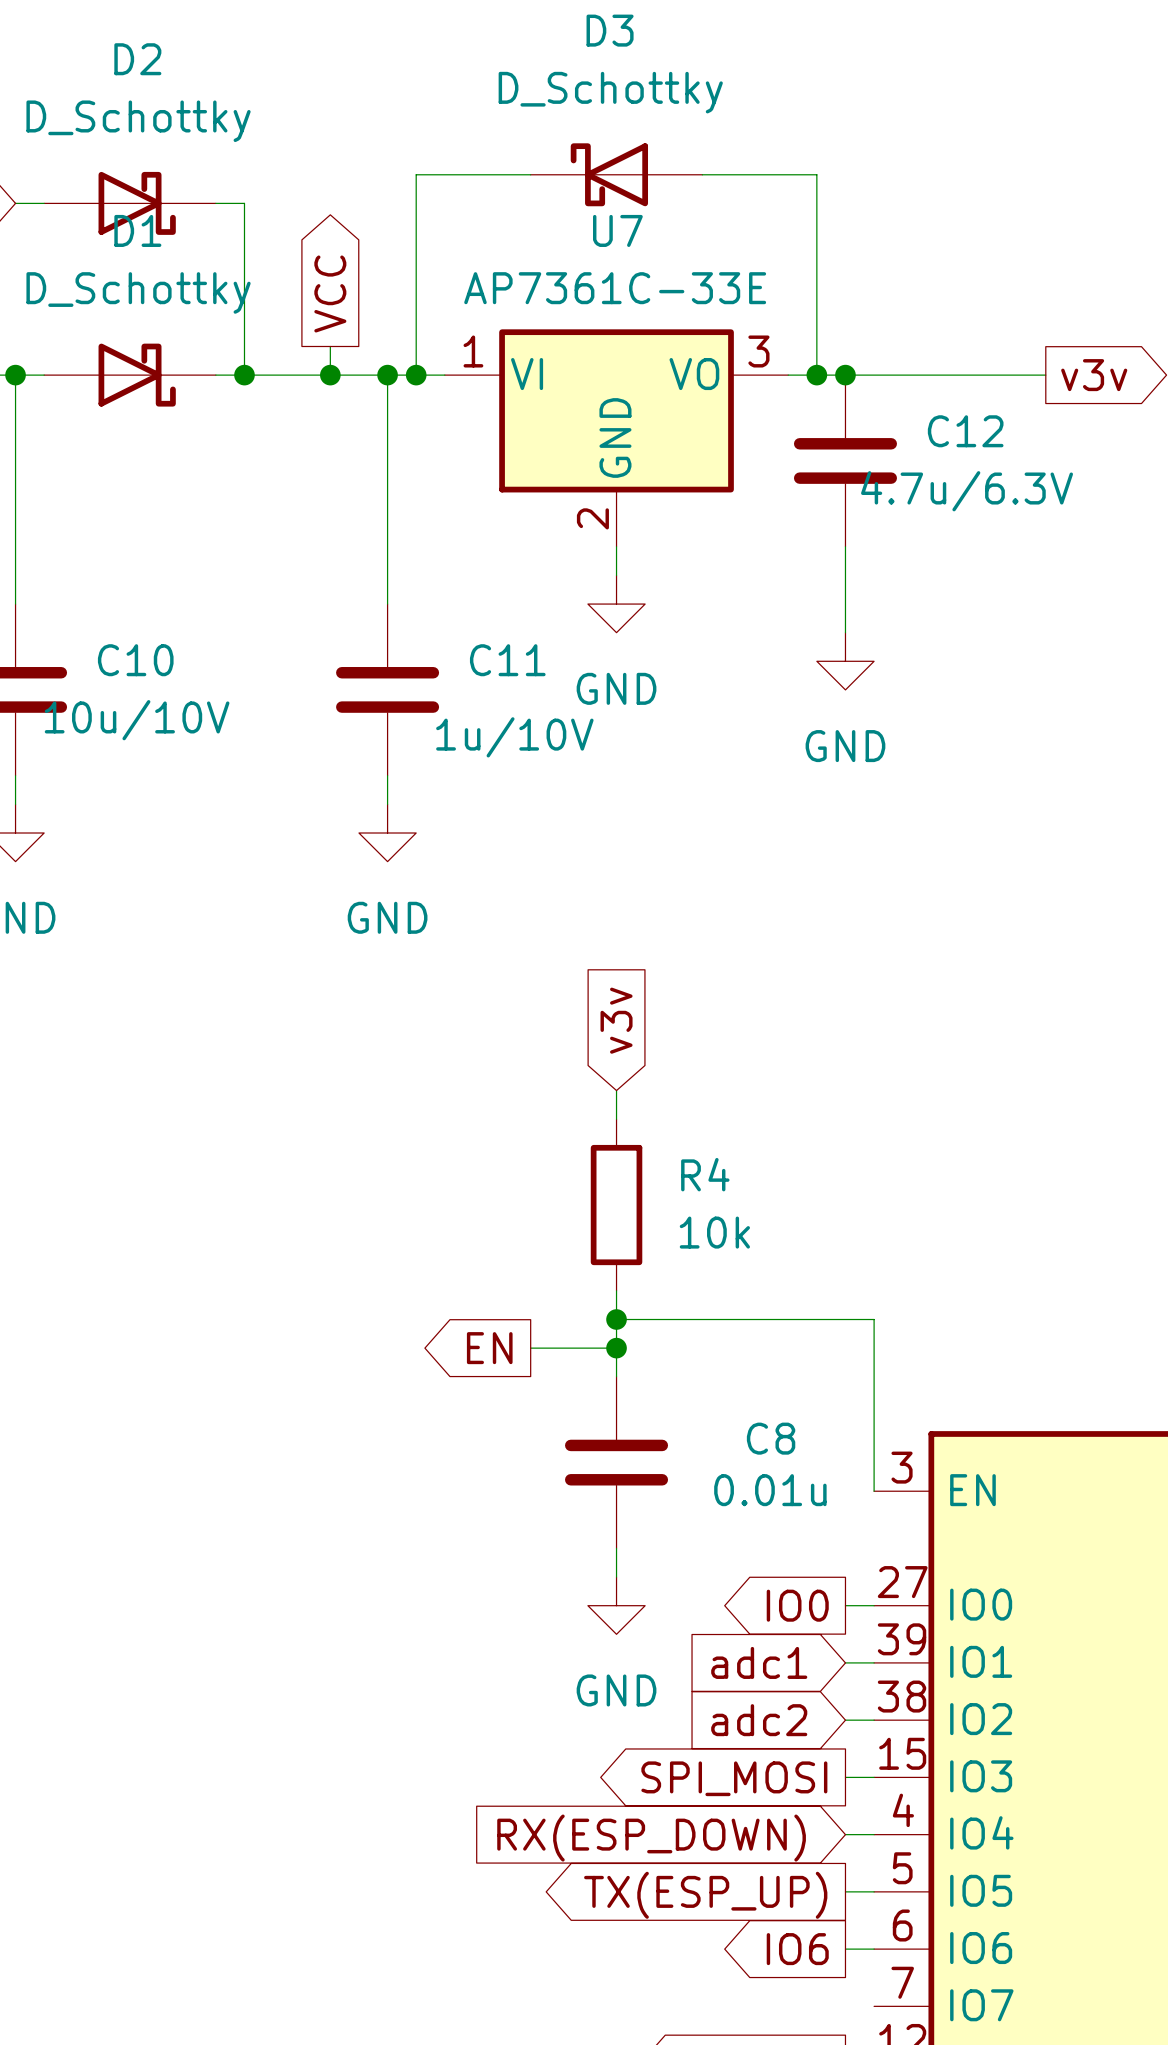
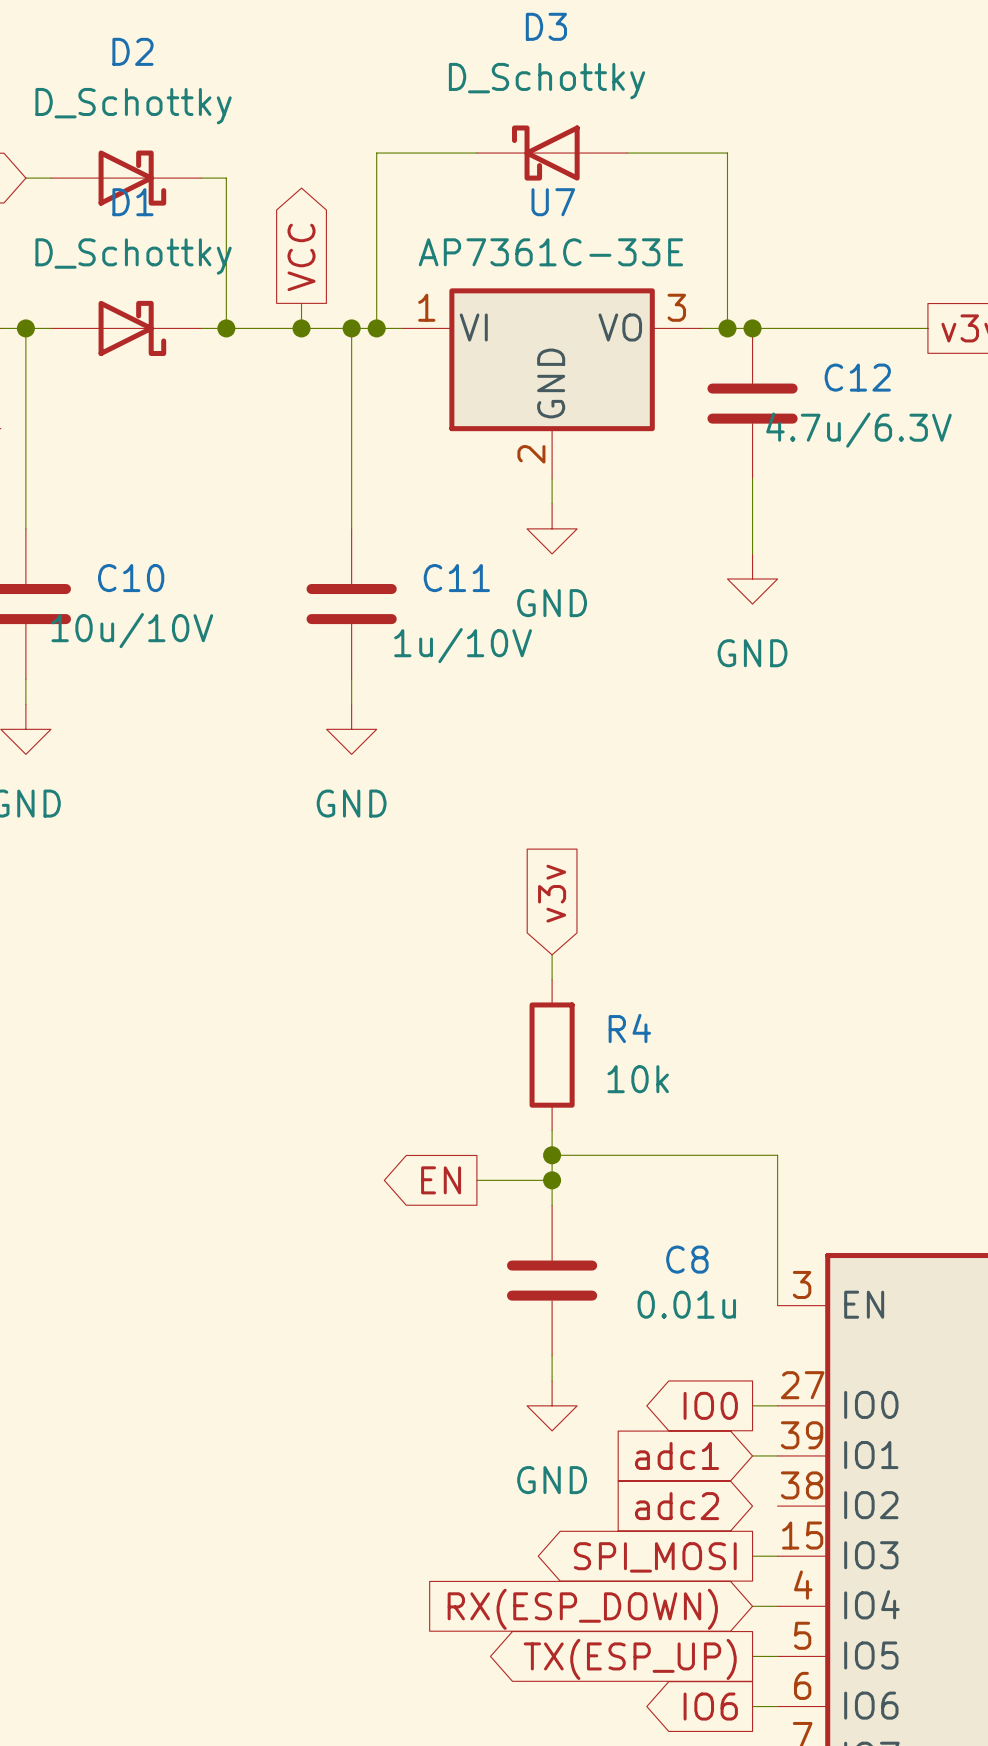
wire: (845, 1720) (874, 1720) -> none

